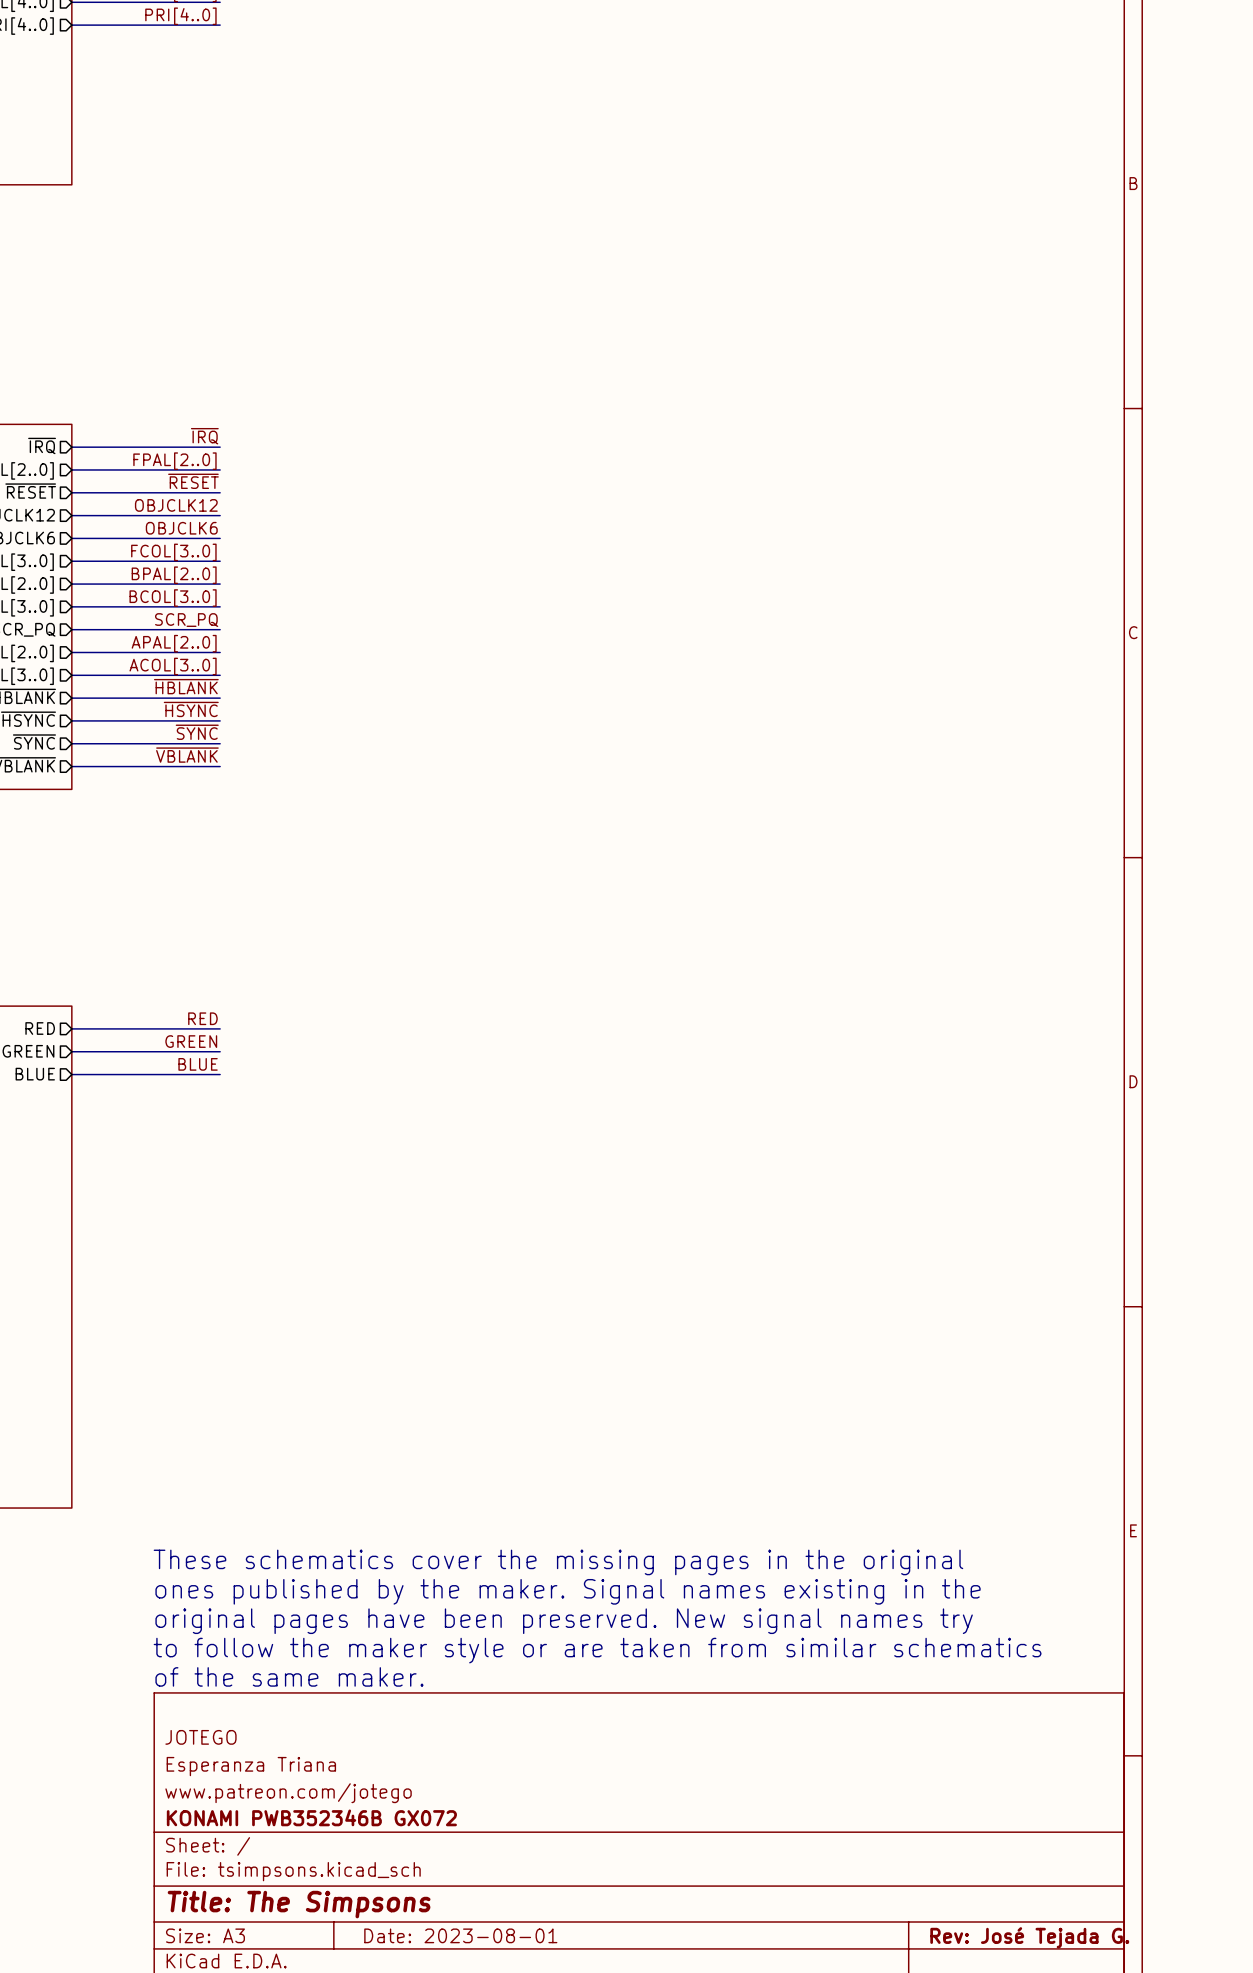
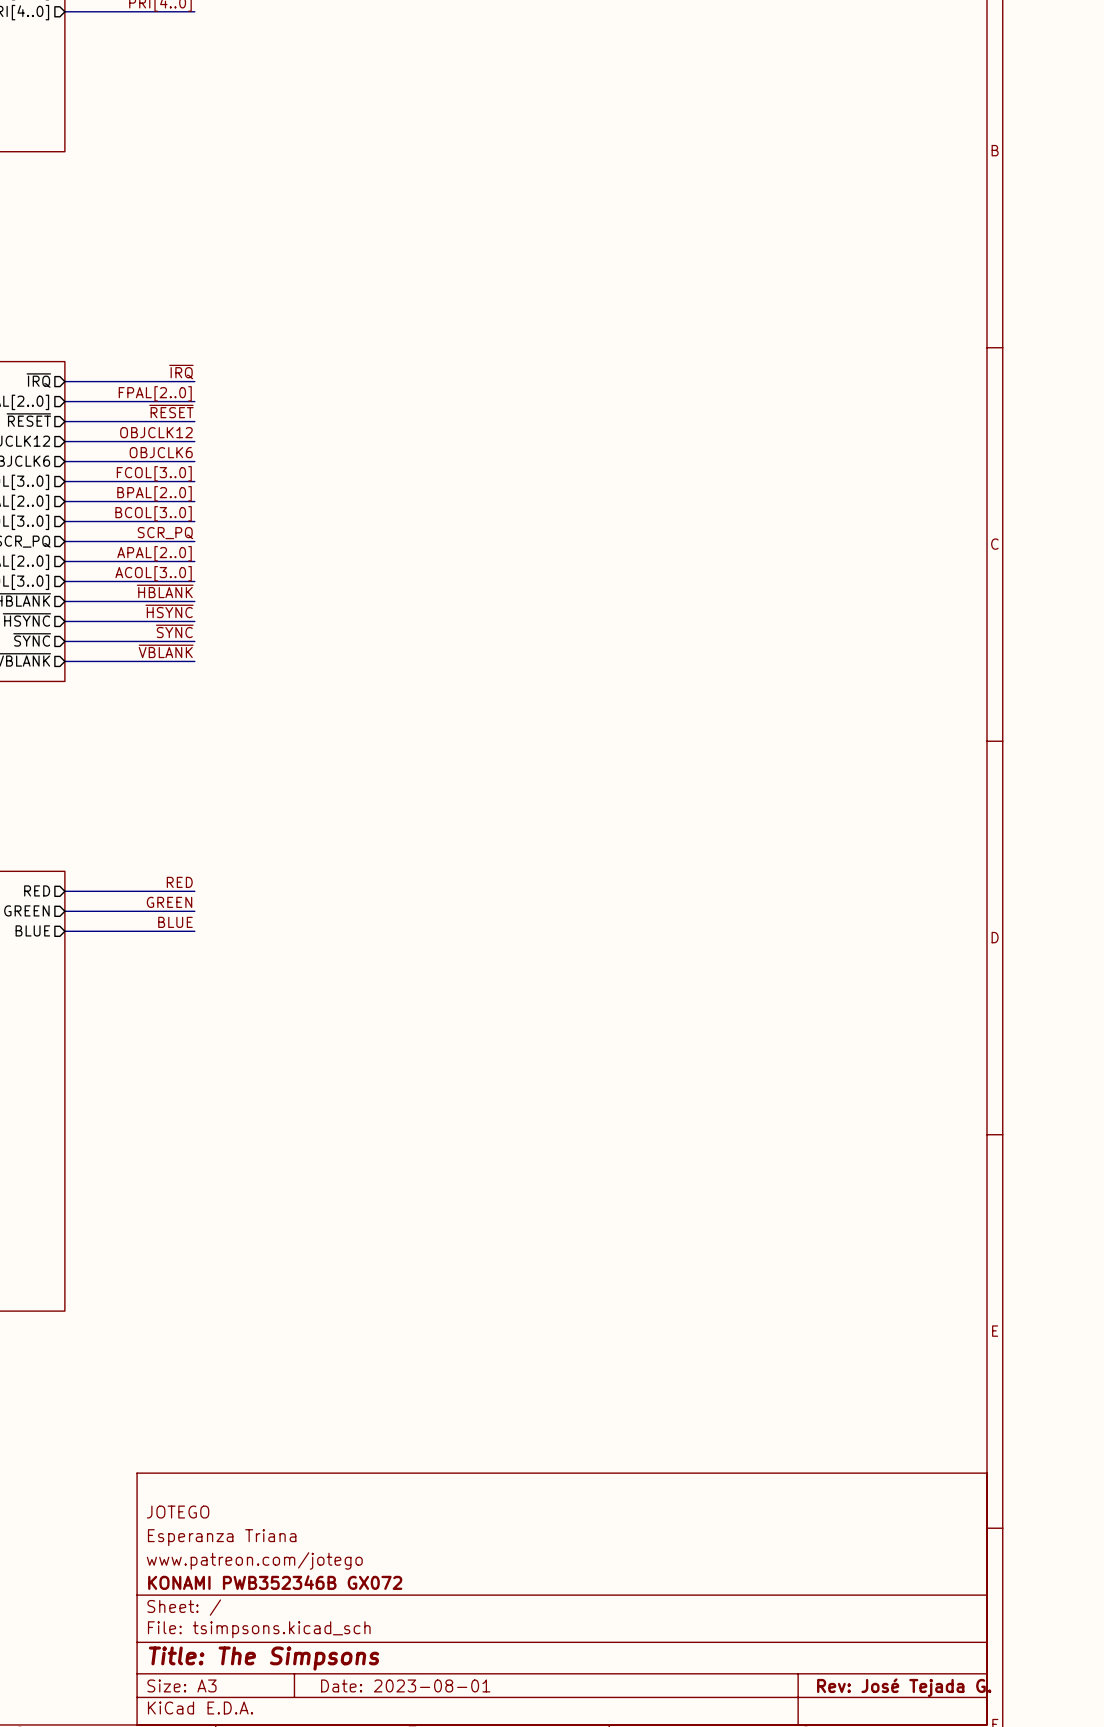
text: These schematics cover the missing pages in the original (558, 1562) -> none
text: ones published by the maker. Signal names existing in the (568, 1591) -> none
text: original pages have been preserved. New signal names try (564, 1621) -> none
text: to follow the maker style or are taken from similar schematics (597, 1650) -> none
text: of the same maker. (289, 1676) -> none

